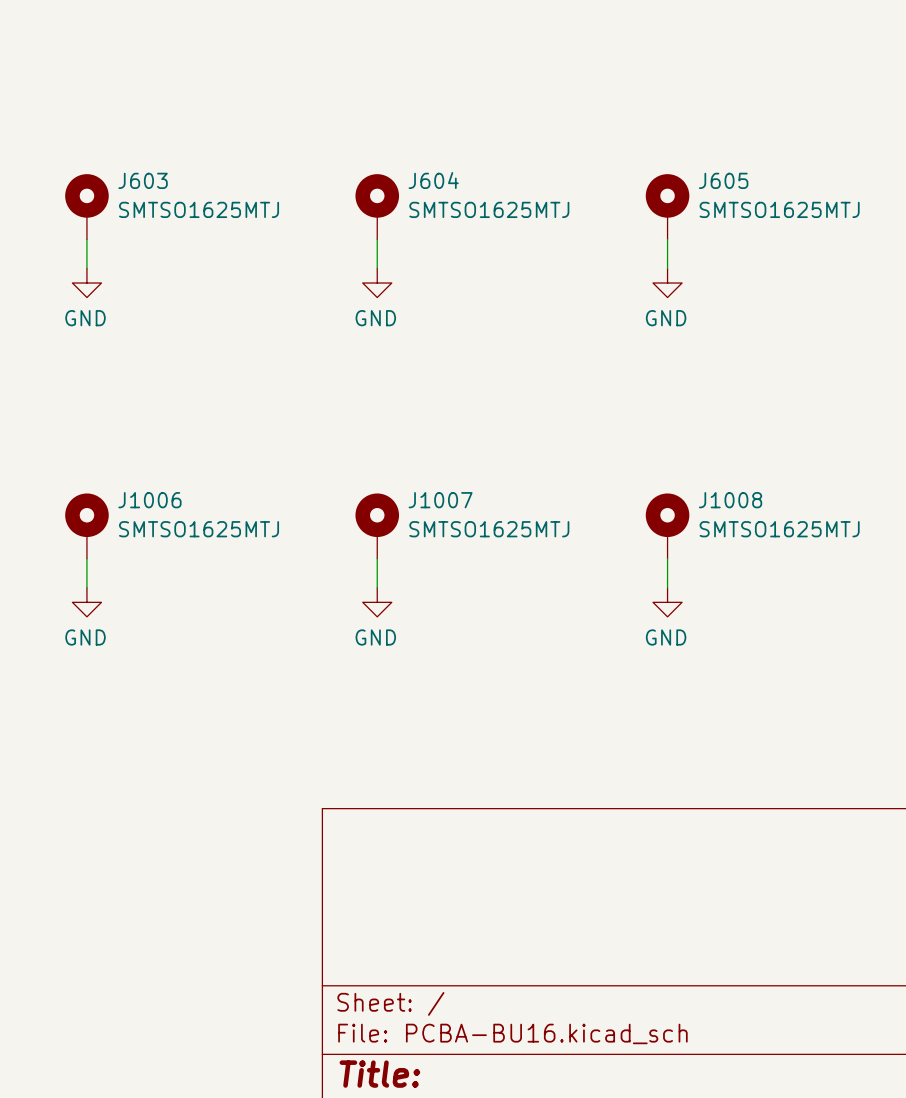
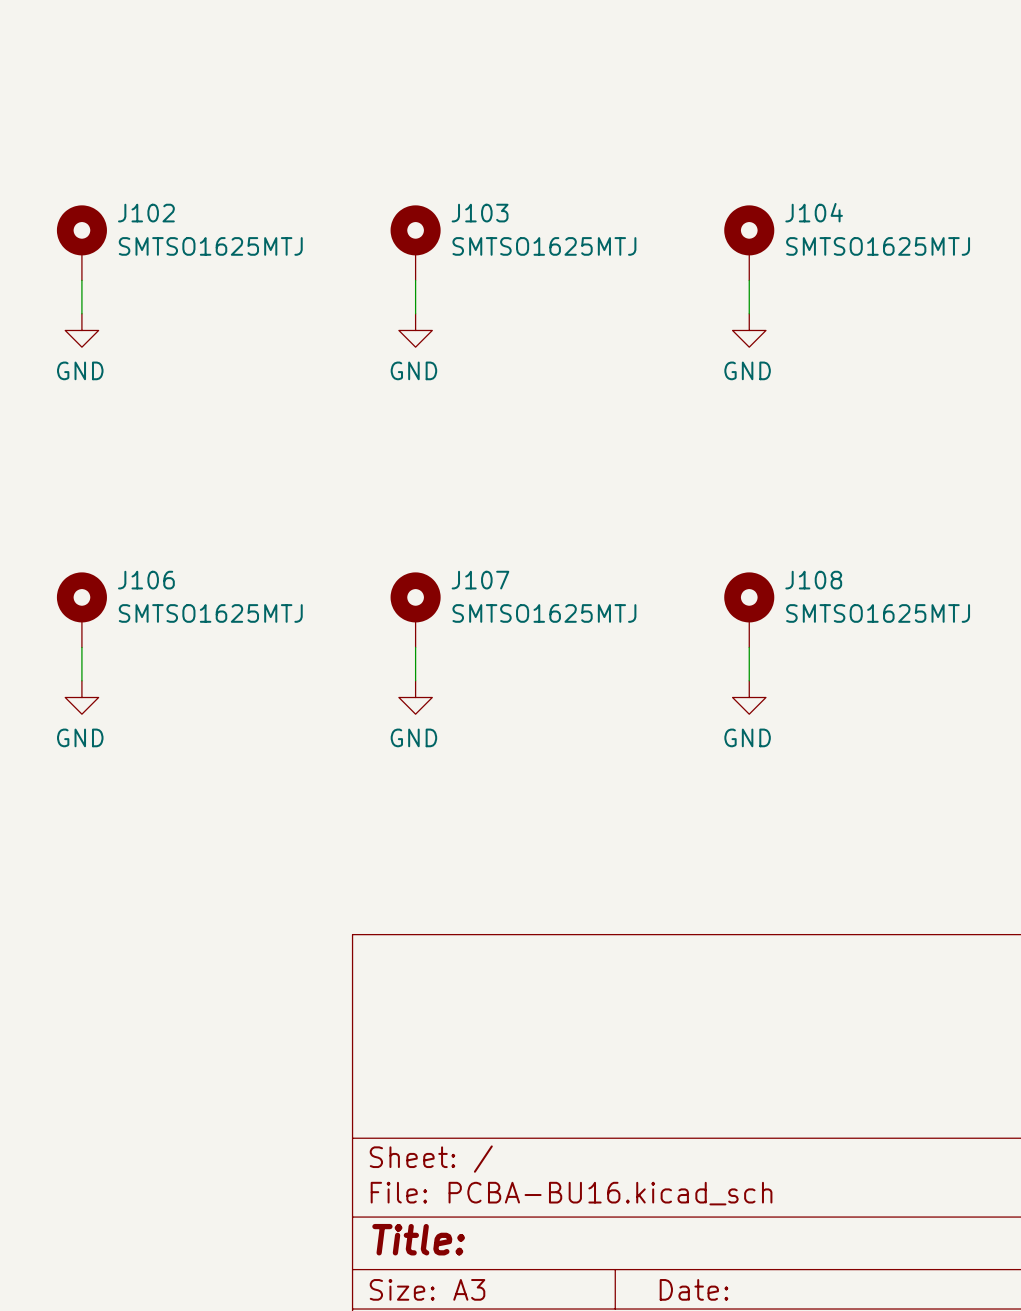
J603 name: J603 (143, 180) -> J102 (146, 213)
J604 name: J604 (433, 180) -> J103 (480, 213)
J605 name: J605 (723, 180) -> J104 (814, 212)
J1006 name: J1006 (149, 500) -> J106 (146, 580)
J1007 name: J1007 (440, 500) -> J107 (480, 580)
J1008 name: J1008 (730, 500) -> J108 (813, 580)

